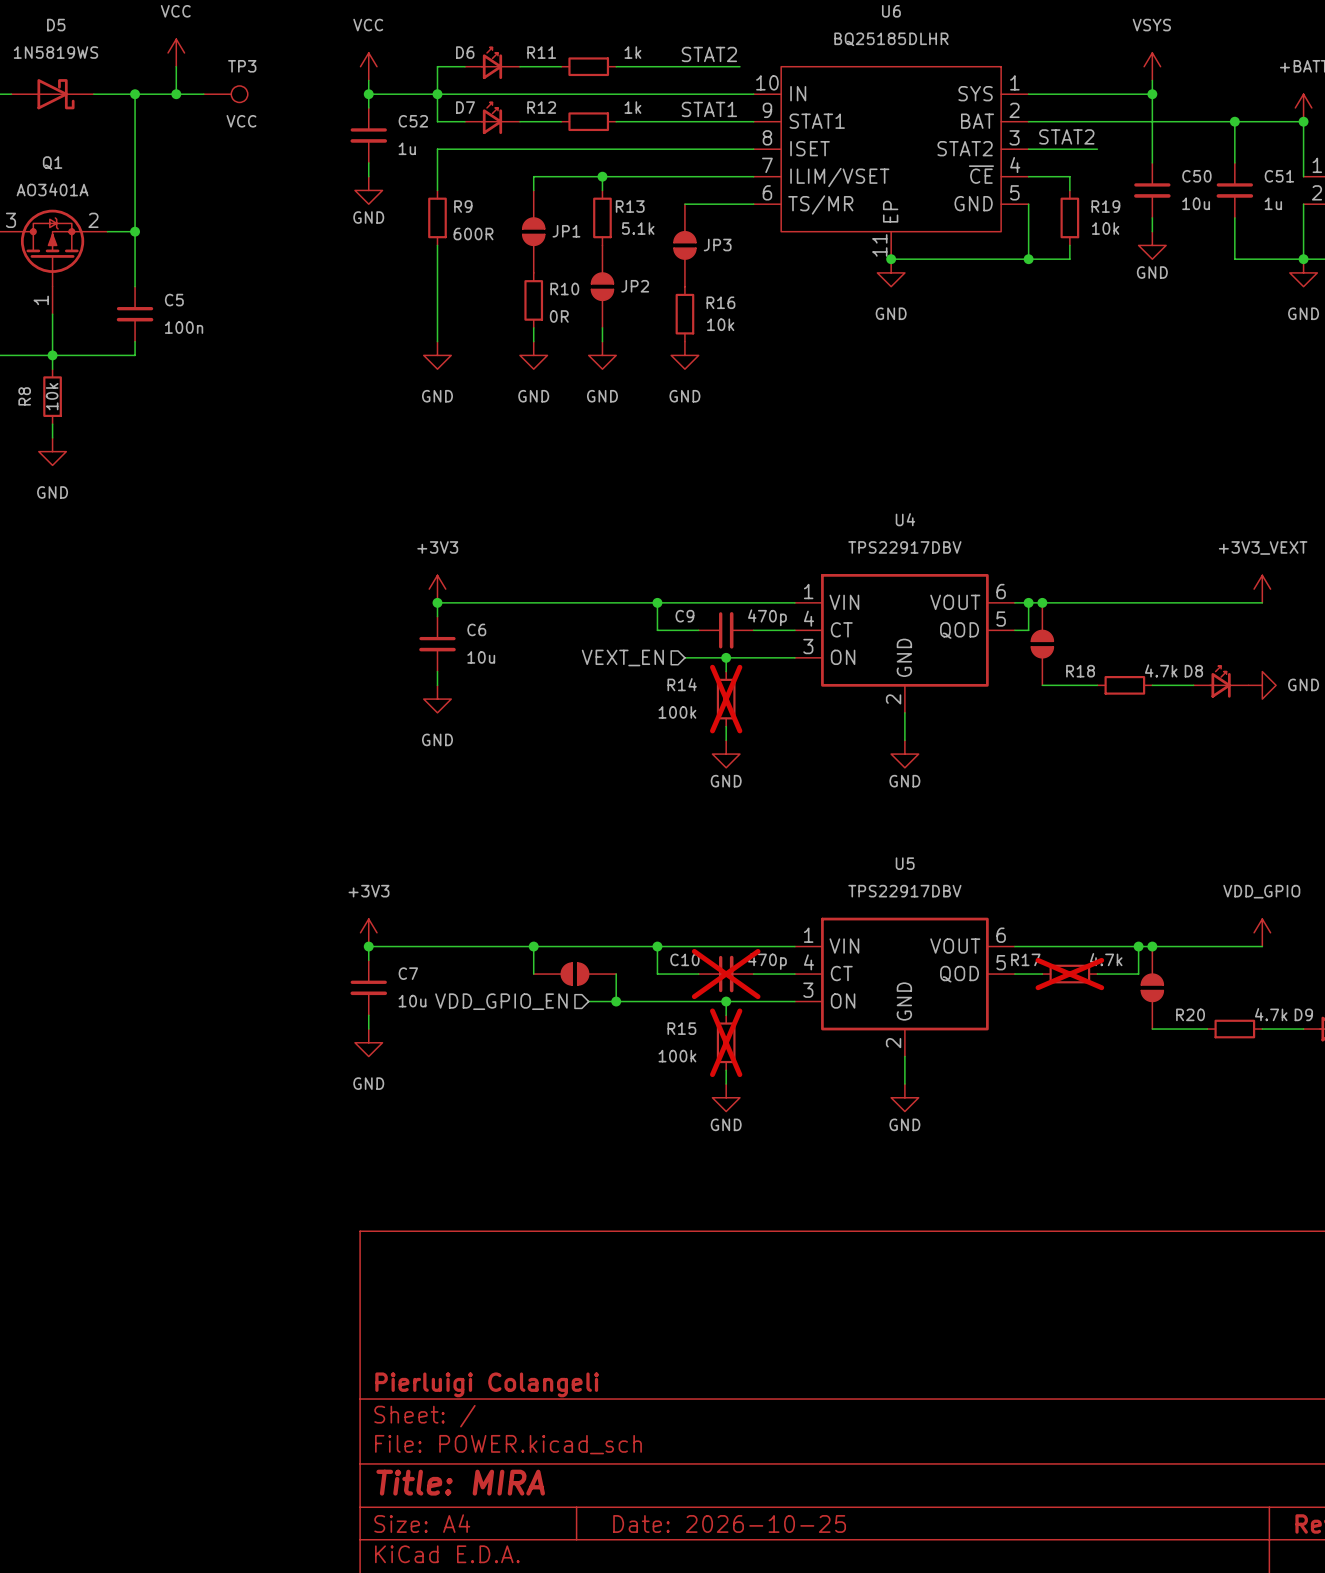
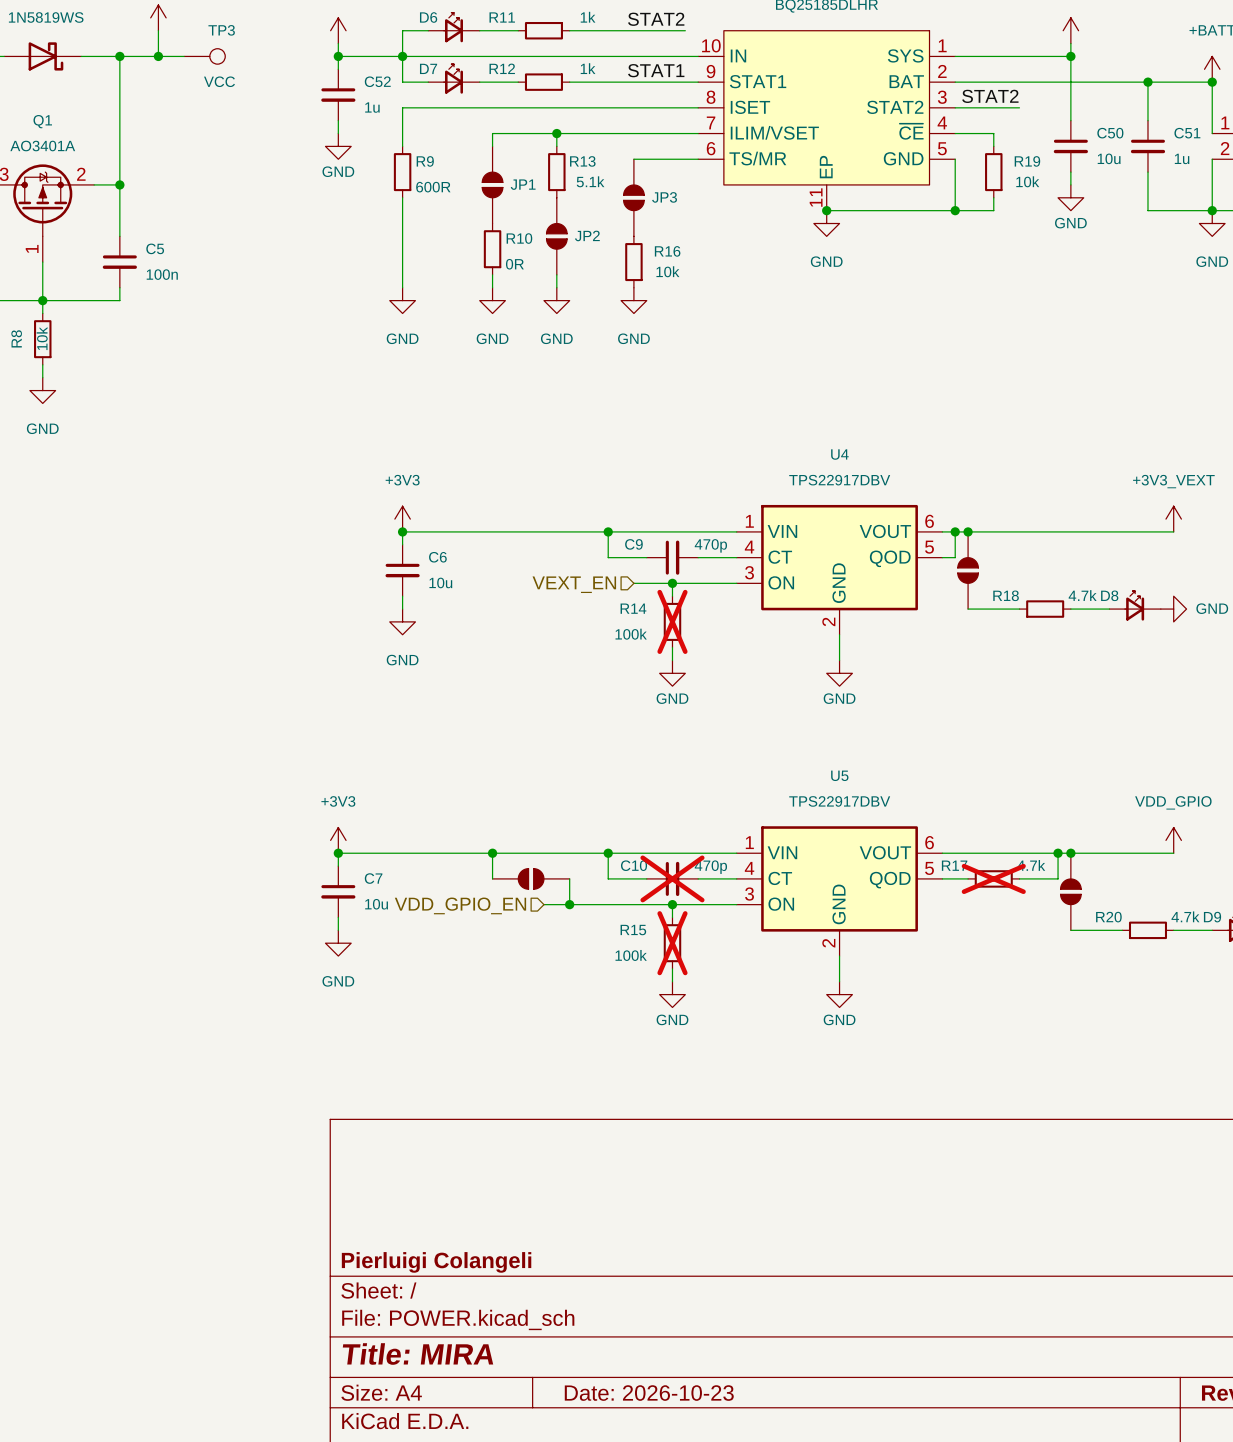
title block: Date: 2026-10-25 (729, 1523) -> Date: 2026-10-23 (649, 1393)

